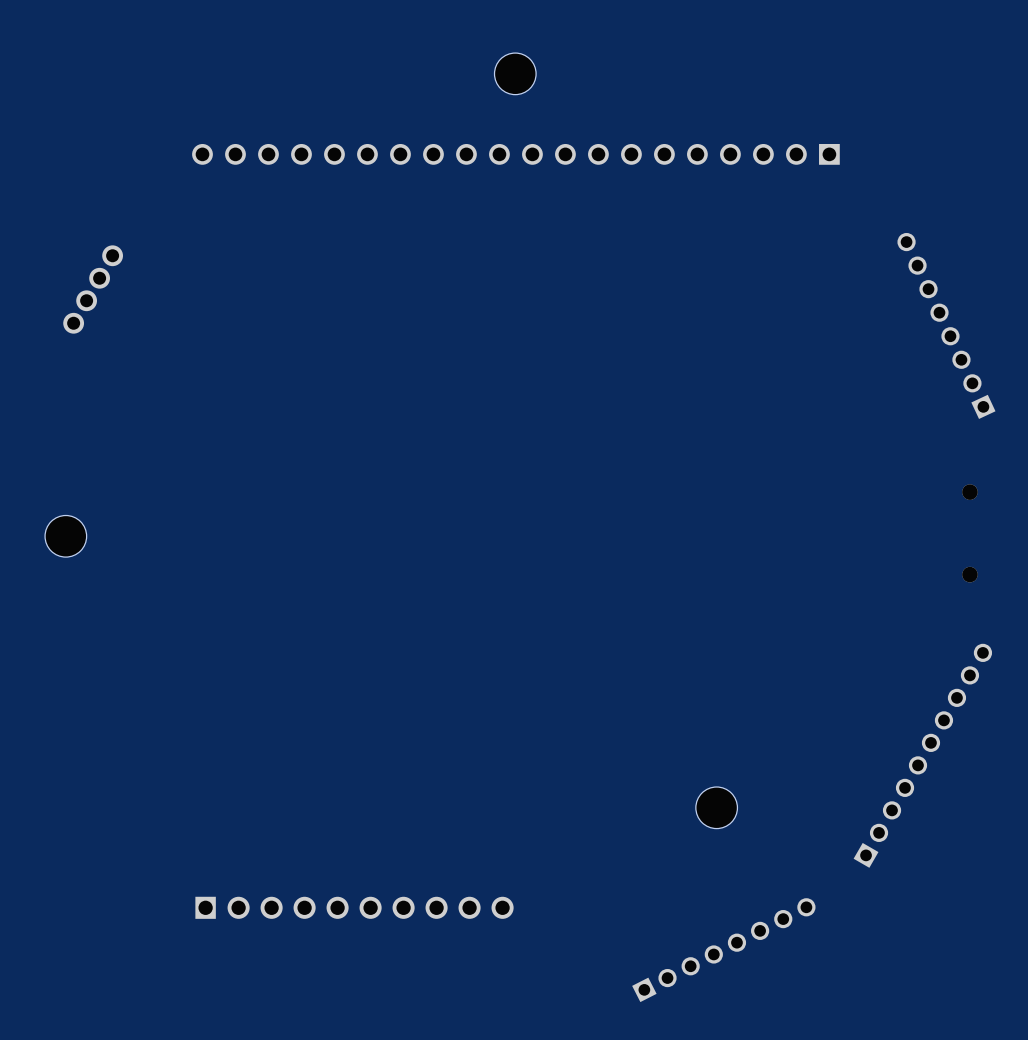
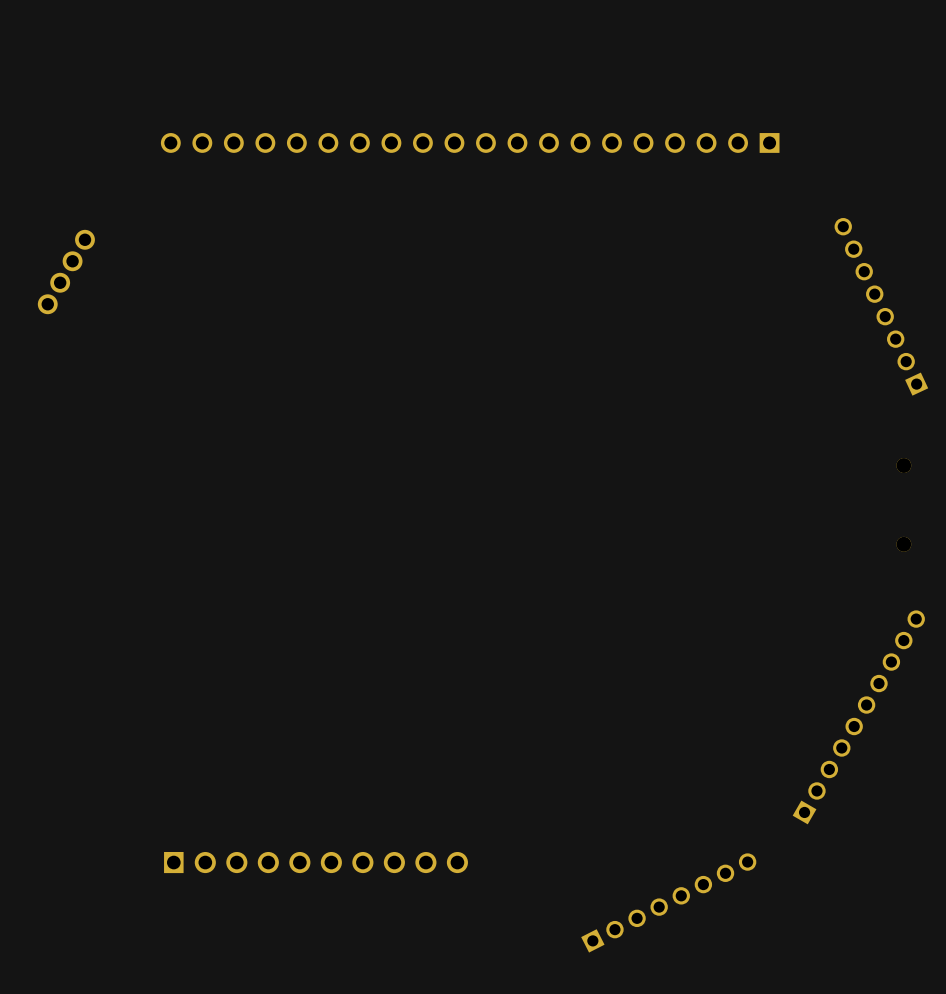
part: (515, 73) -> none
part: (65, 536) -> none
part: (716, 807) -> none

